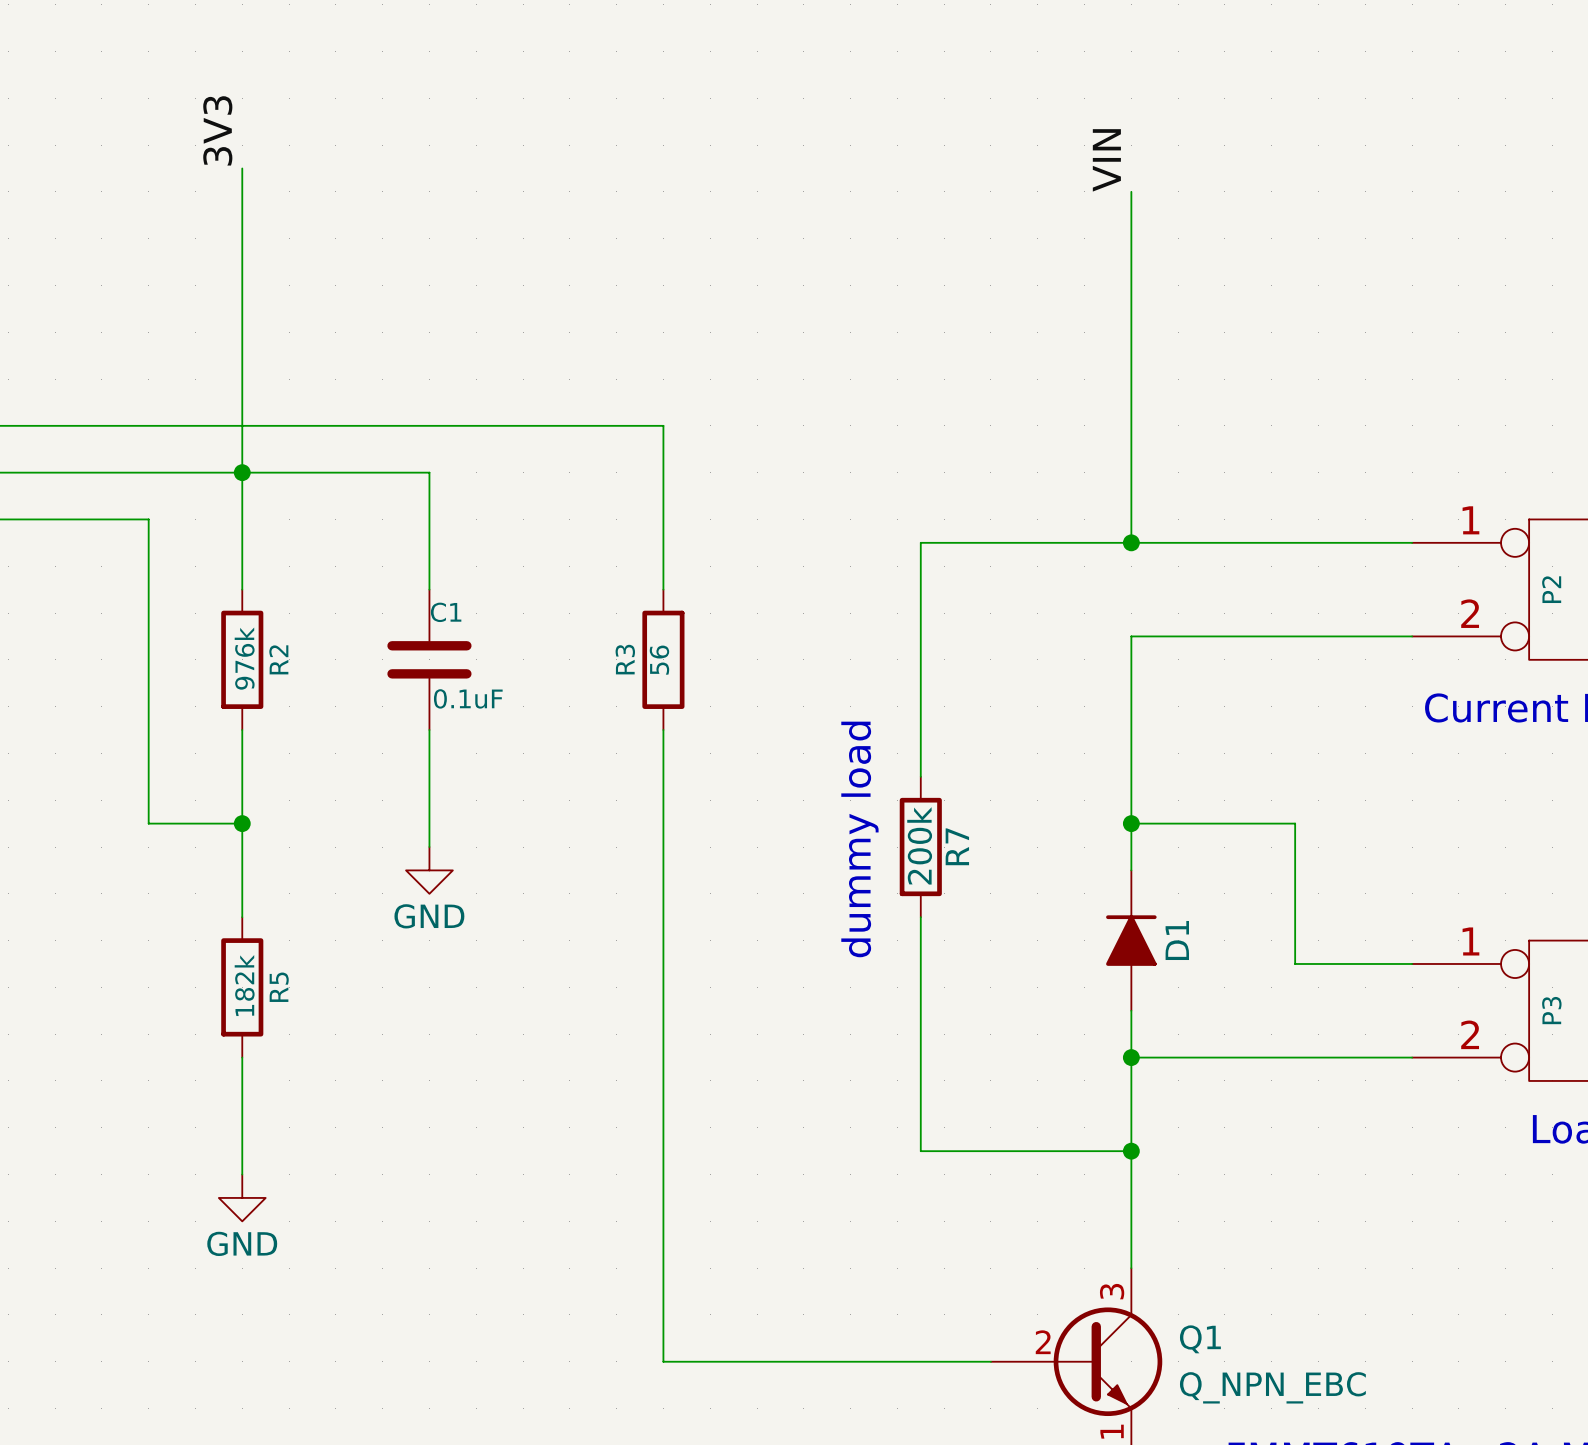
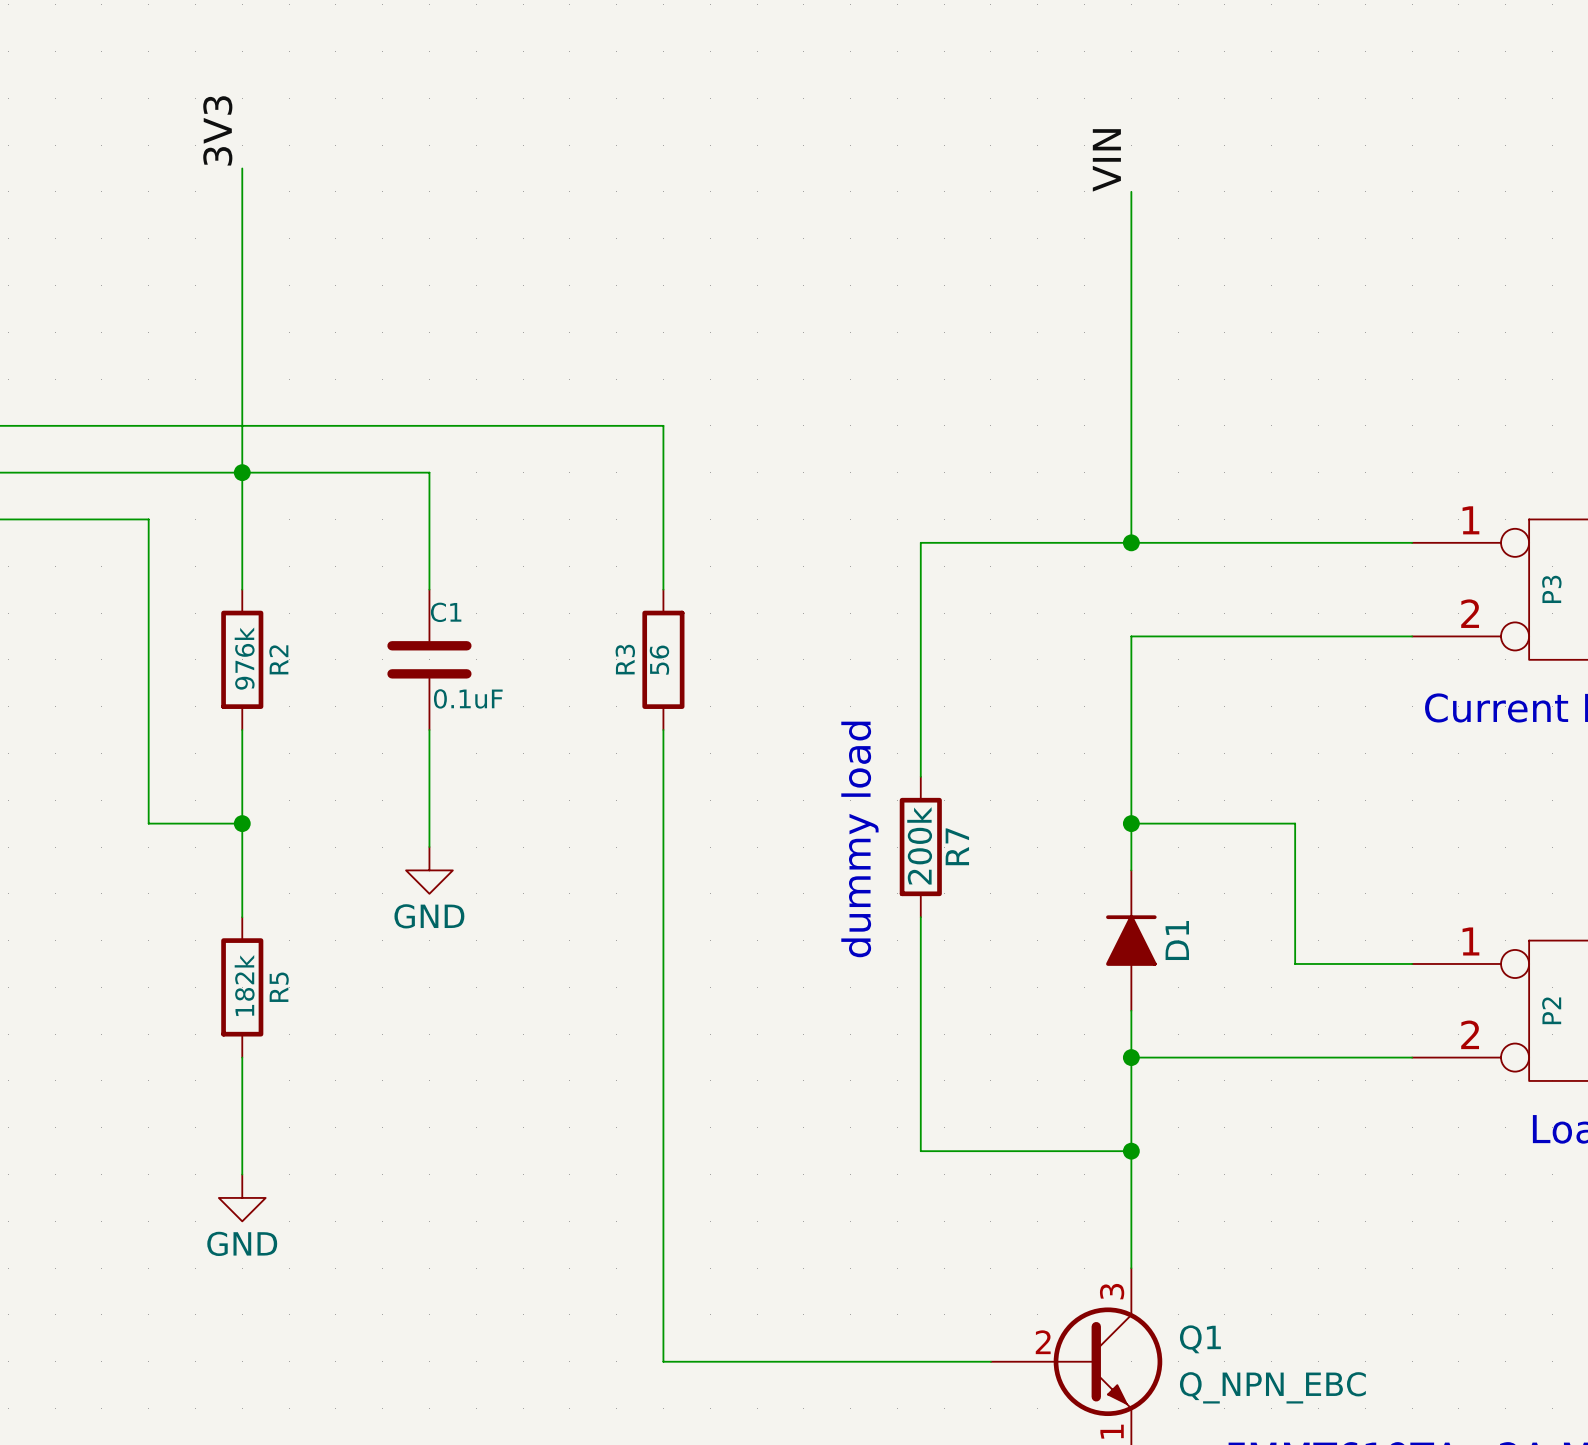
P2 name: P2 (1551, 589) -> P3 (1551, 589)
P3 name: P3 (1551, 1010) -> P2 (1551, 1010)

